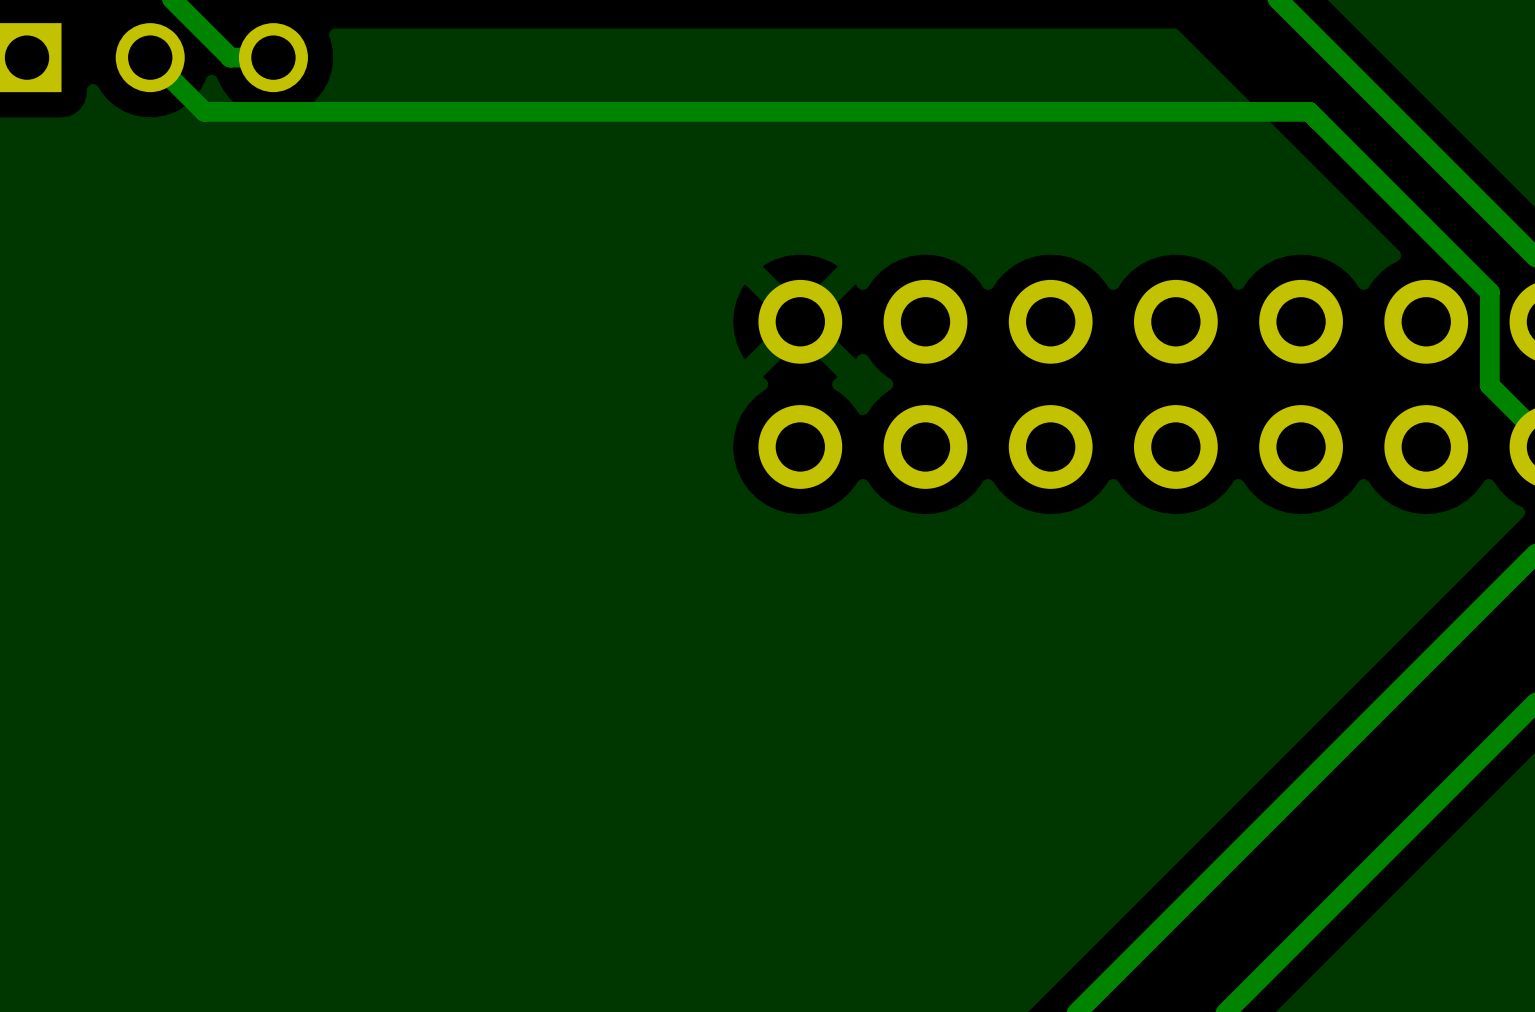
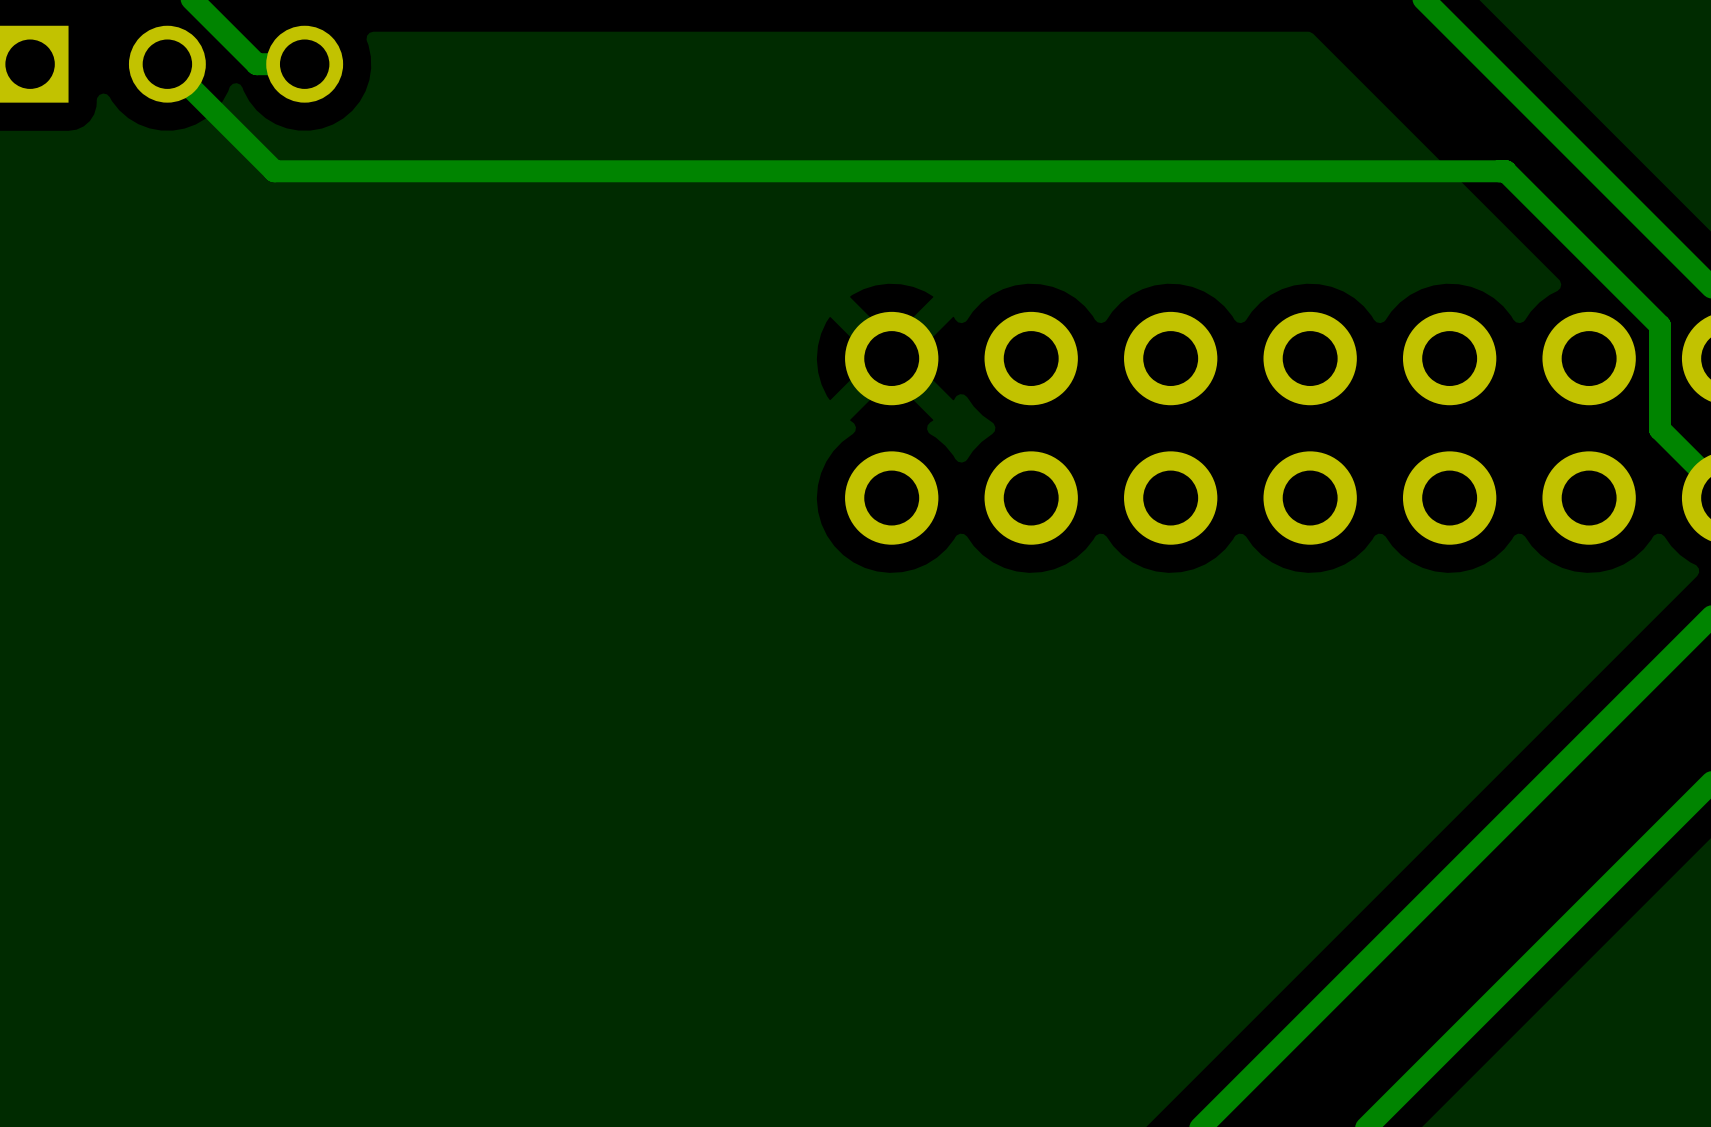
track: (204, 111) (1309, 111) (1351, 153) -> (227, 124) (274, 171) (1505, 171)

